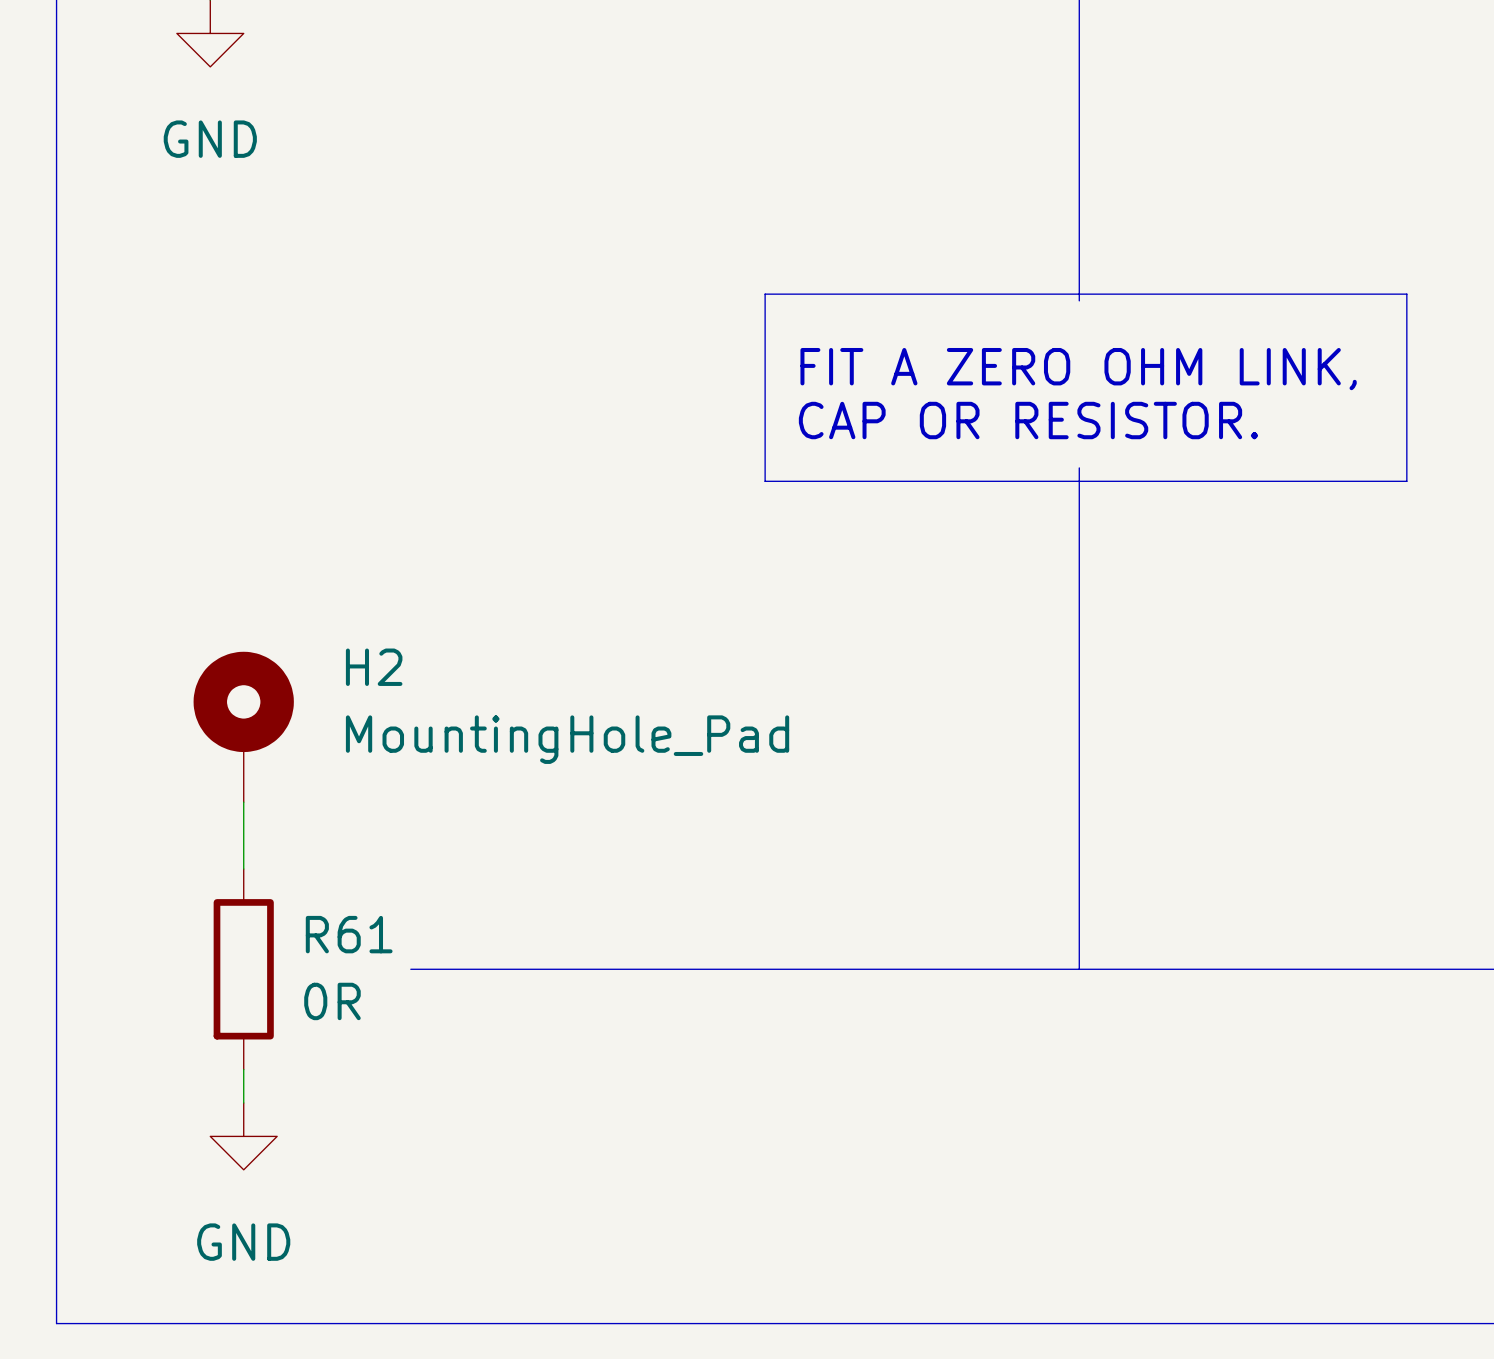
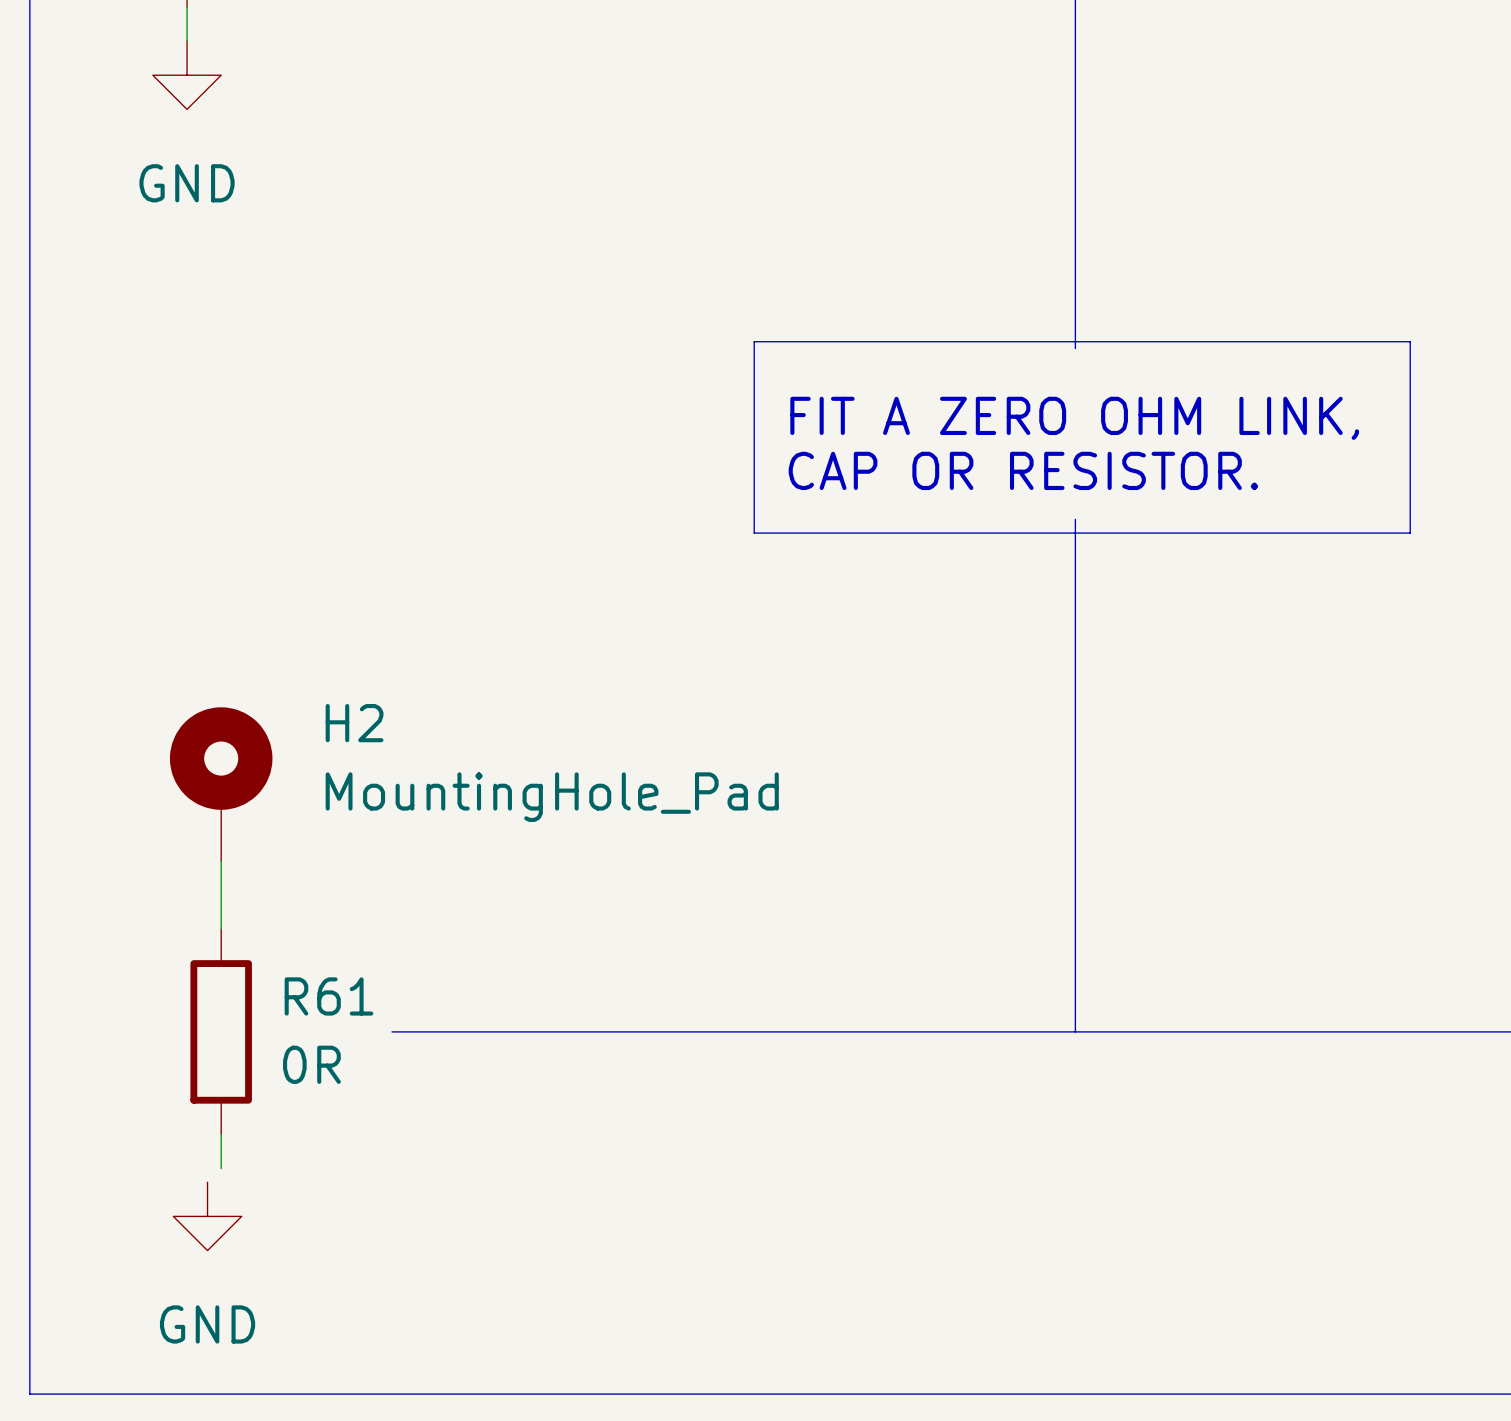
power symbol position: GND (243, 1136) -> GND (207, 1216)

